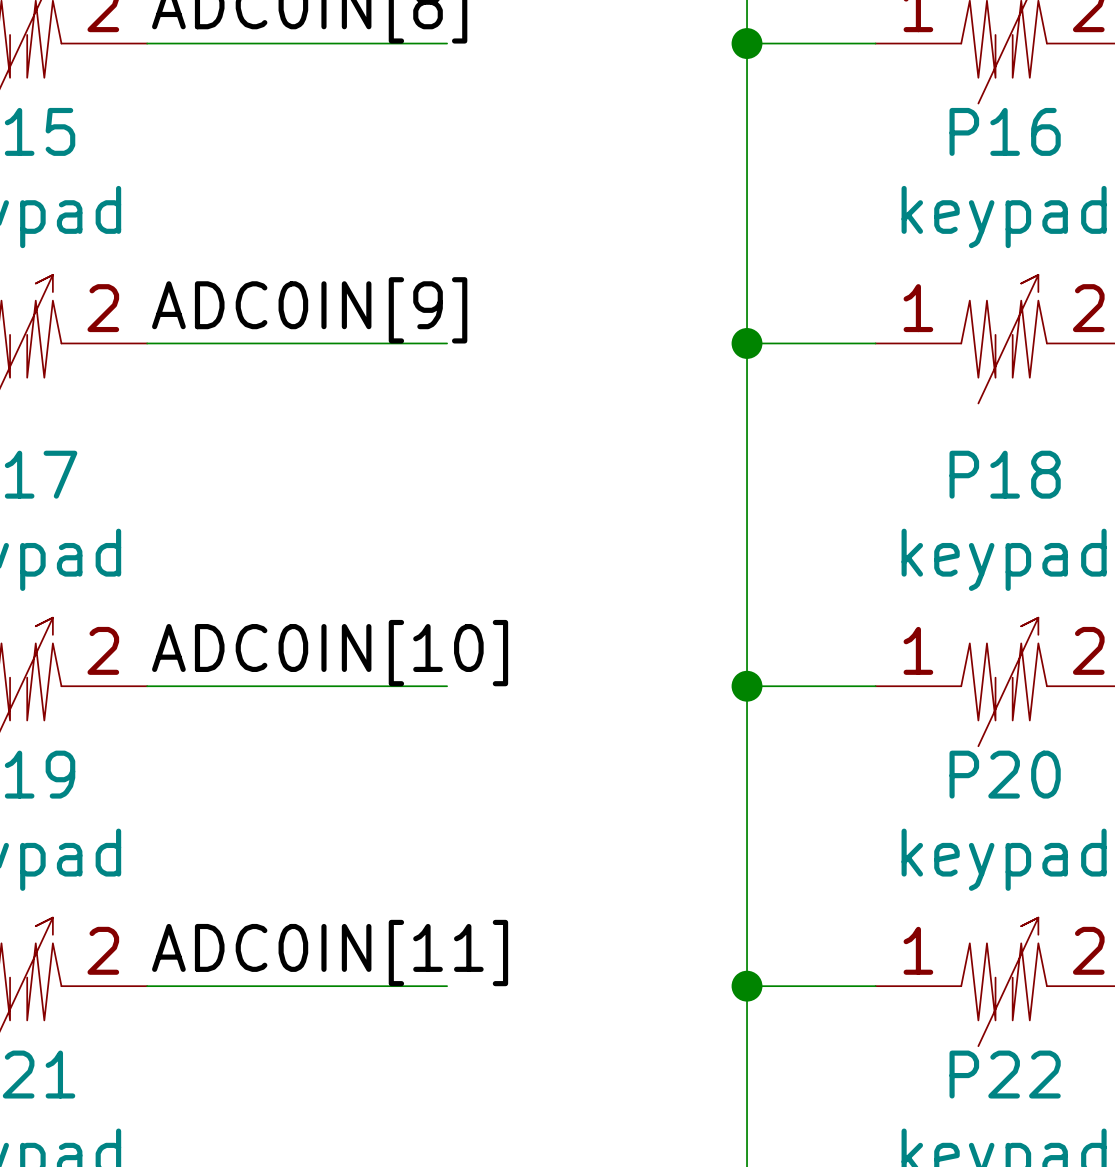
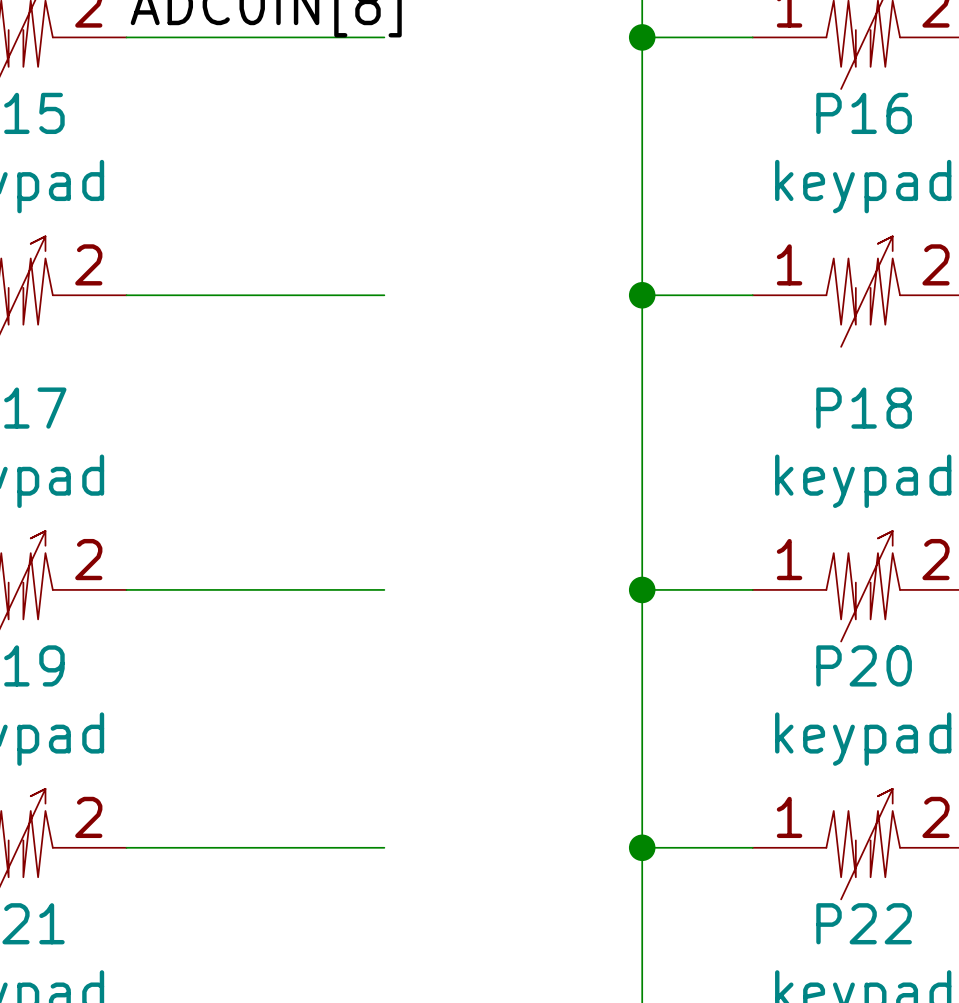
label: ADC0IN[9] (309, 310) -> none
label: ADC0IN[10] (330, 653) -> none
label: ADC0IN[11] (330, 953) -> none

